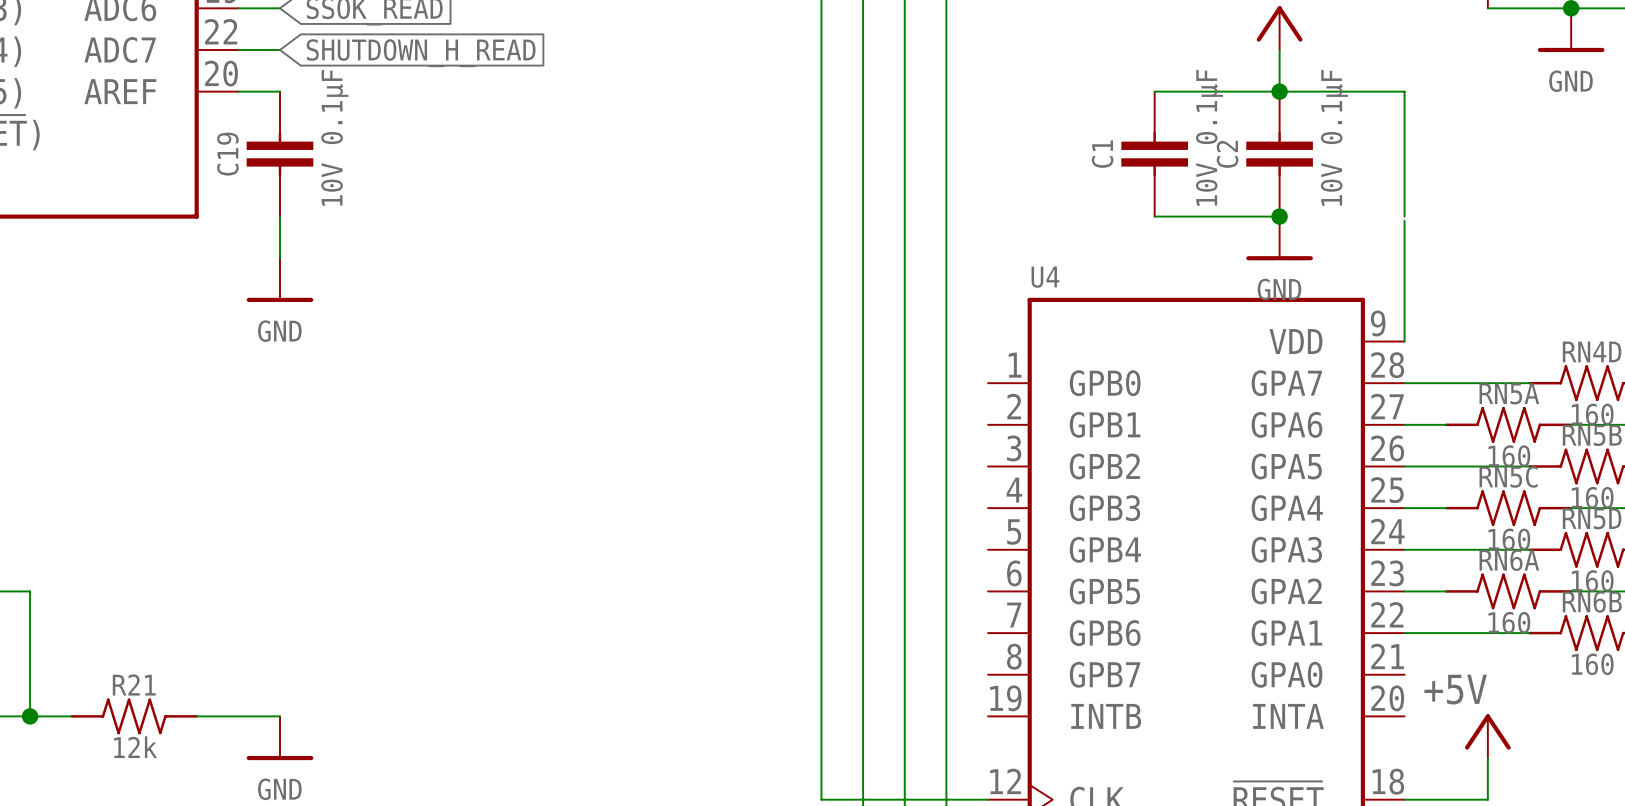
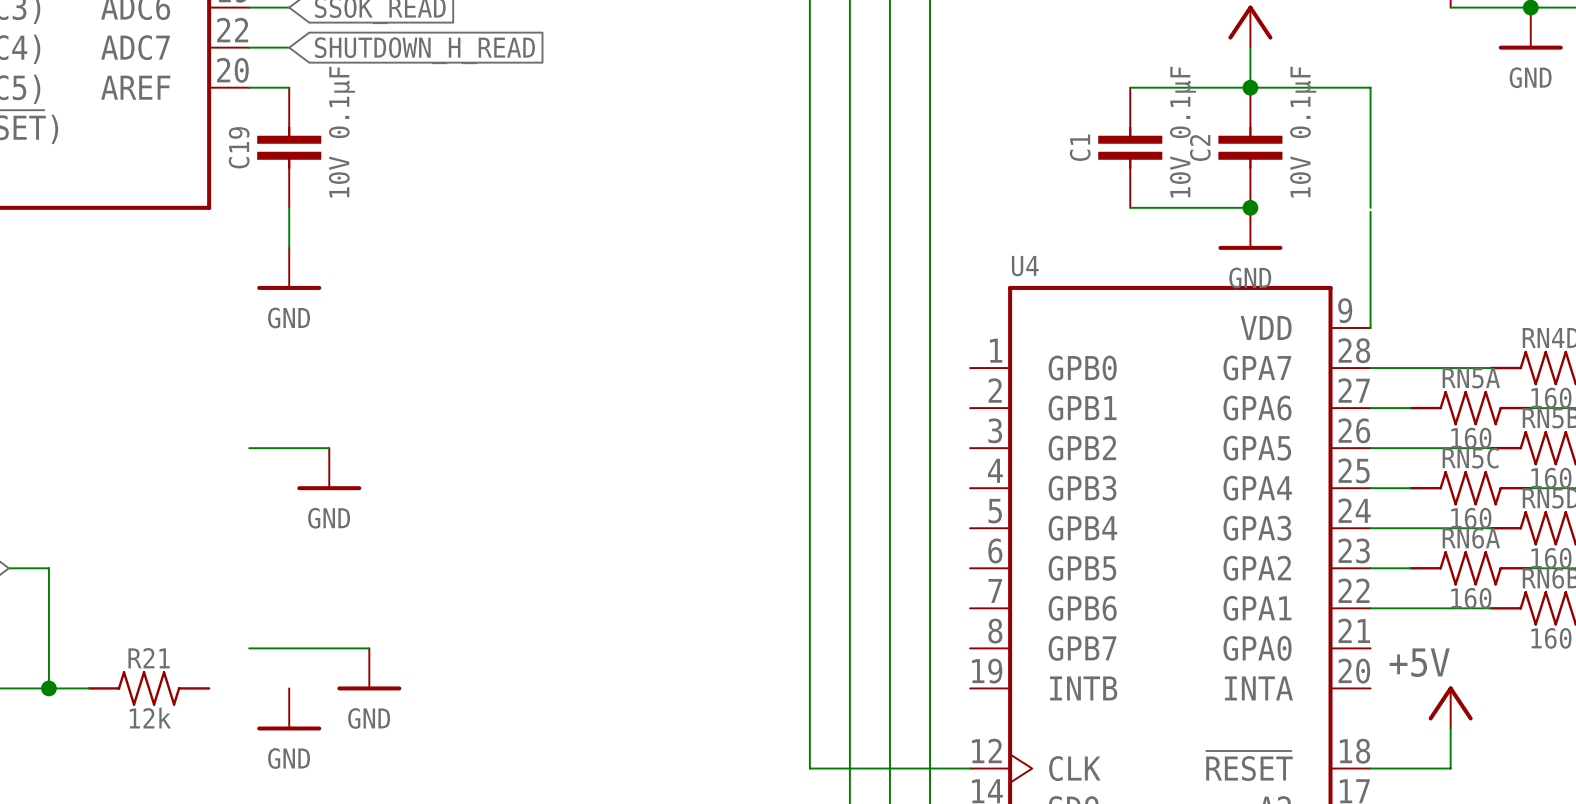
power symbol: none -> GND (329, 469)
wire: none -> (249, 648) (369, 648)
power symbol: none -> GND (369, 669)
wire: (196, 716) (279, 716) -> (249, 448) (329, 448)

